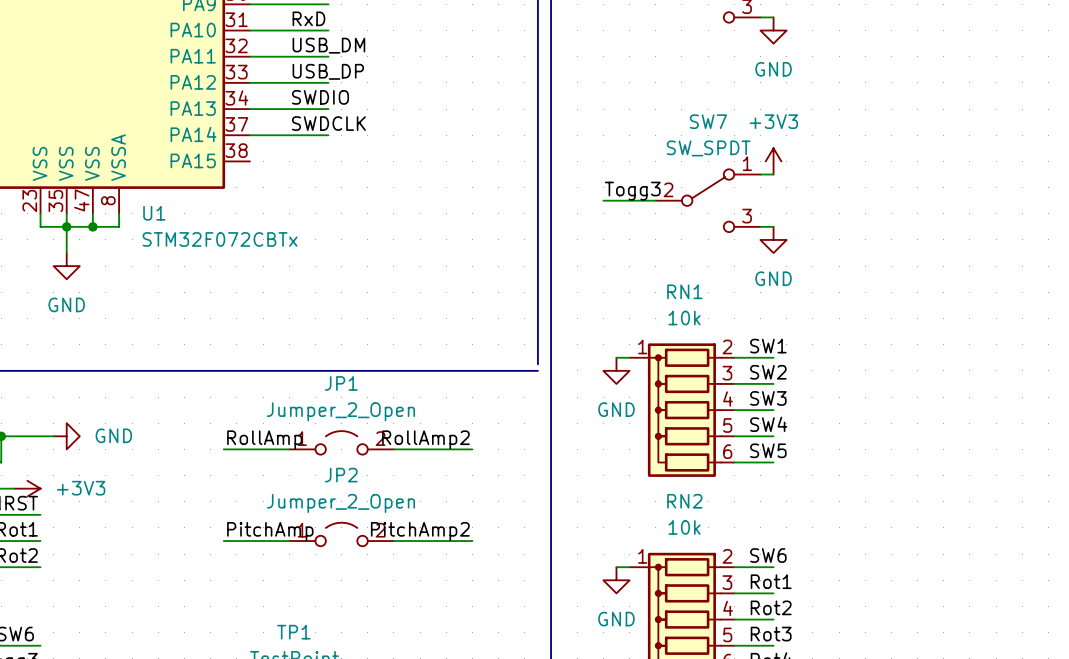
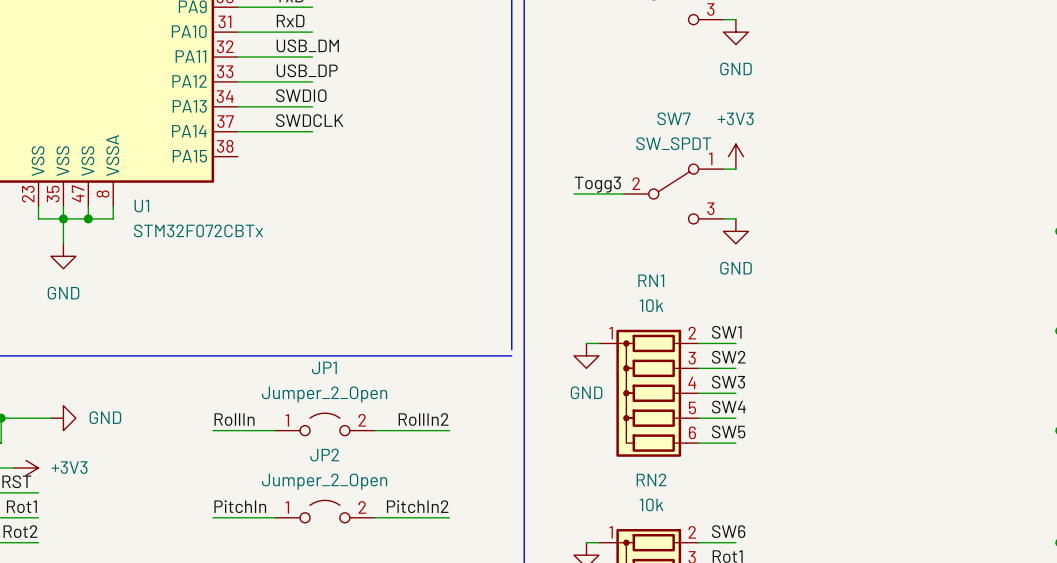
label: RollAmp (264, 439) -> RollIn (234, 419)
label: RollAmp2 (425, 439) -> RollIn2 (423, 419)
label: PitchAmp (270, 531) -> PitchIn (240, 506)
label: PitchAmp2 (420, 531) -> PitchIn2 (417, 506)

